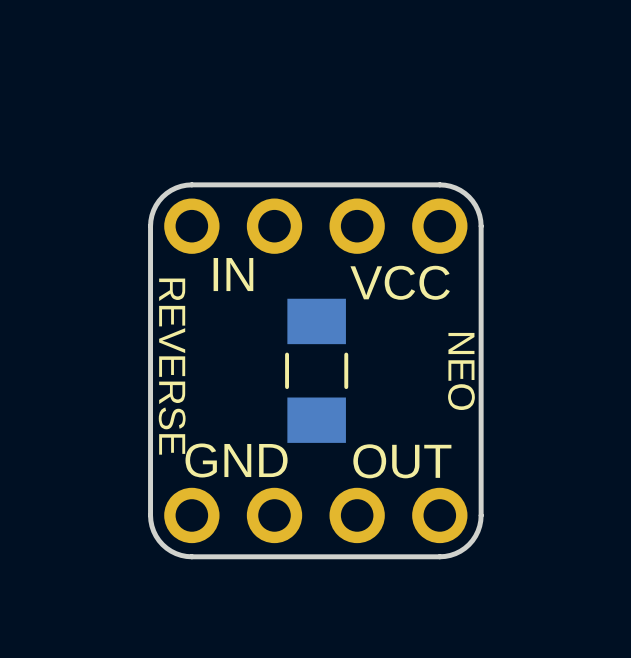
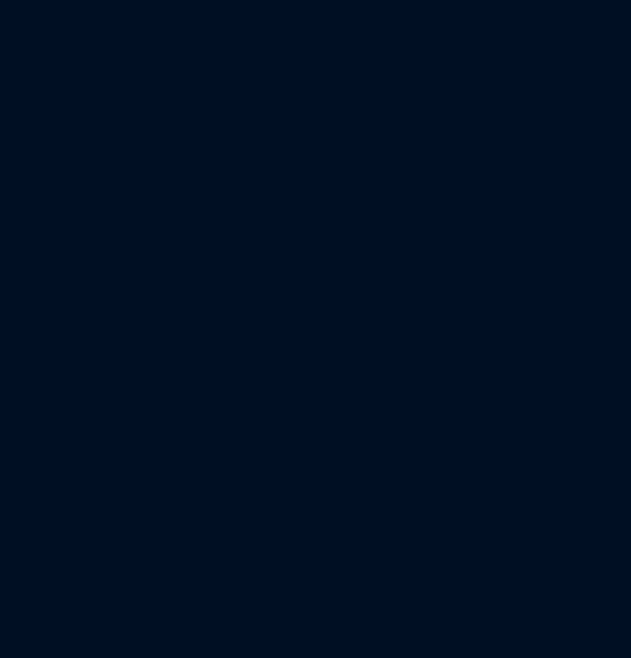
part: (315, 226) -> none
text: IN (233, 274) -> none
text: VCC (400, 282) -> none
text: REVERSE (172, 366) -> none
part: (316, 370) -> none
text: NEO (461, 371) -> none
text: GND (236, 460) -> none
text: OUT (402, 461) -> none
board edge: (150, 515) (150, 226) (153, 210) (162, 196) (176, 188) (191, 184) (439, 184) (455, 188) (469, 196) (477, 210) (481, 226) (481, 515) (477, 531) (469, 544) (455, 553) (439, 556) (186, 556) (171, 551) (162, 544) (153, 531) (150, 515) -> none
part: (315, 515) -> none

